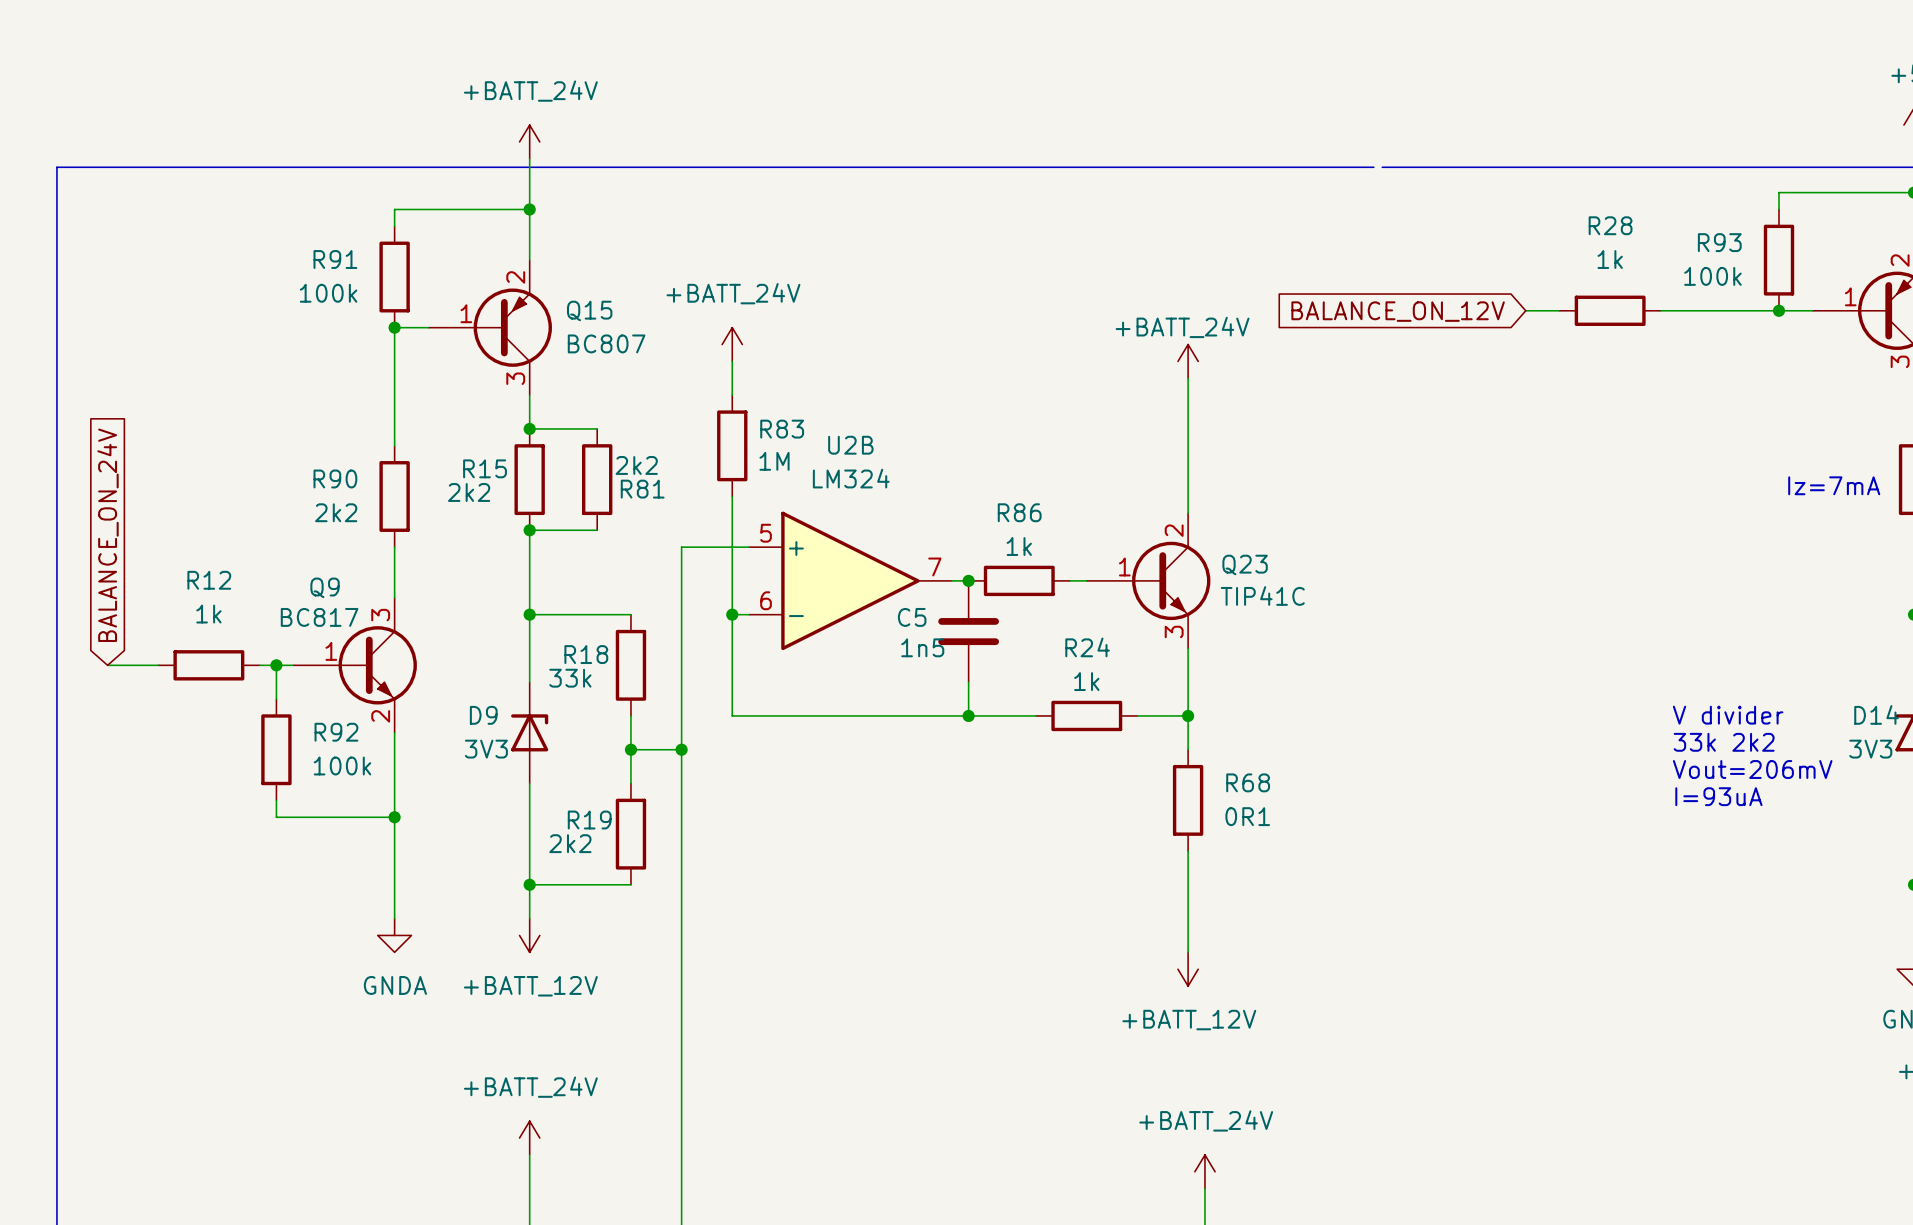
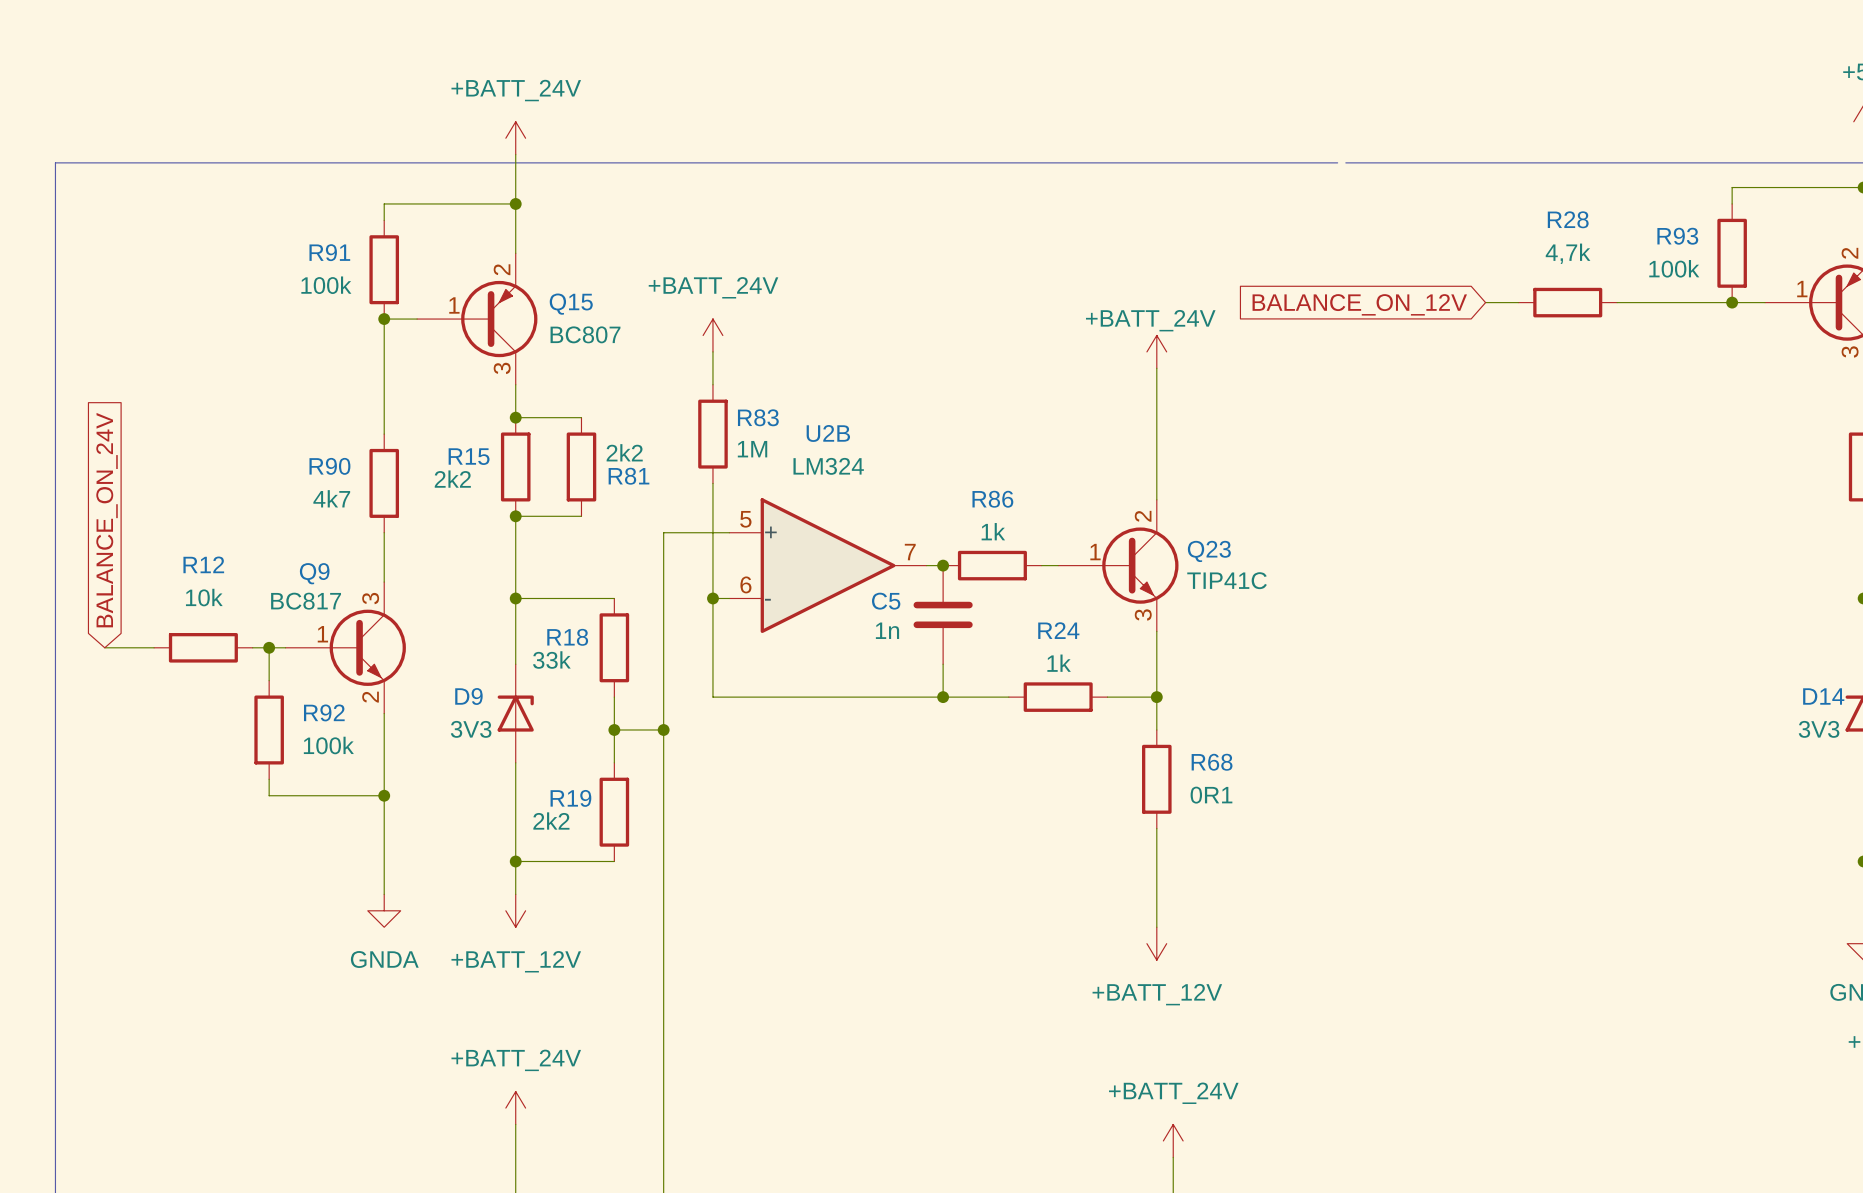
R28 value: 1k (1610, 259) -> 4,7k (1568, 253)
text: Iz=7mA (1834, 485) -> none
R90 value: 2k2 (336, 512) -> 4k7 (331, 498)
R12 value: 1k (208, 614) -> 10k (204, 597)
C5 value: 1n5 (922, 647) -> 1n (887, 630)
text: V divider (1728, 715) -> none
text: 33k 2k2 (1724, 742) -> none
text: Vout=206mV (1752, 769) -> none
text: I=93uA (1718, 796) -> none

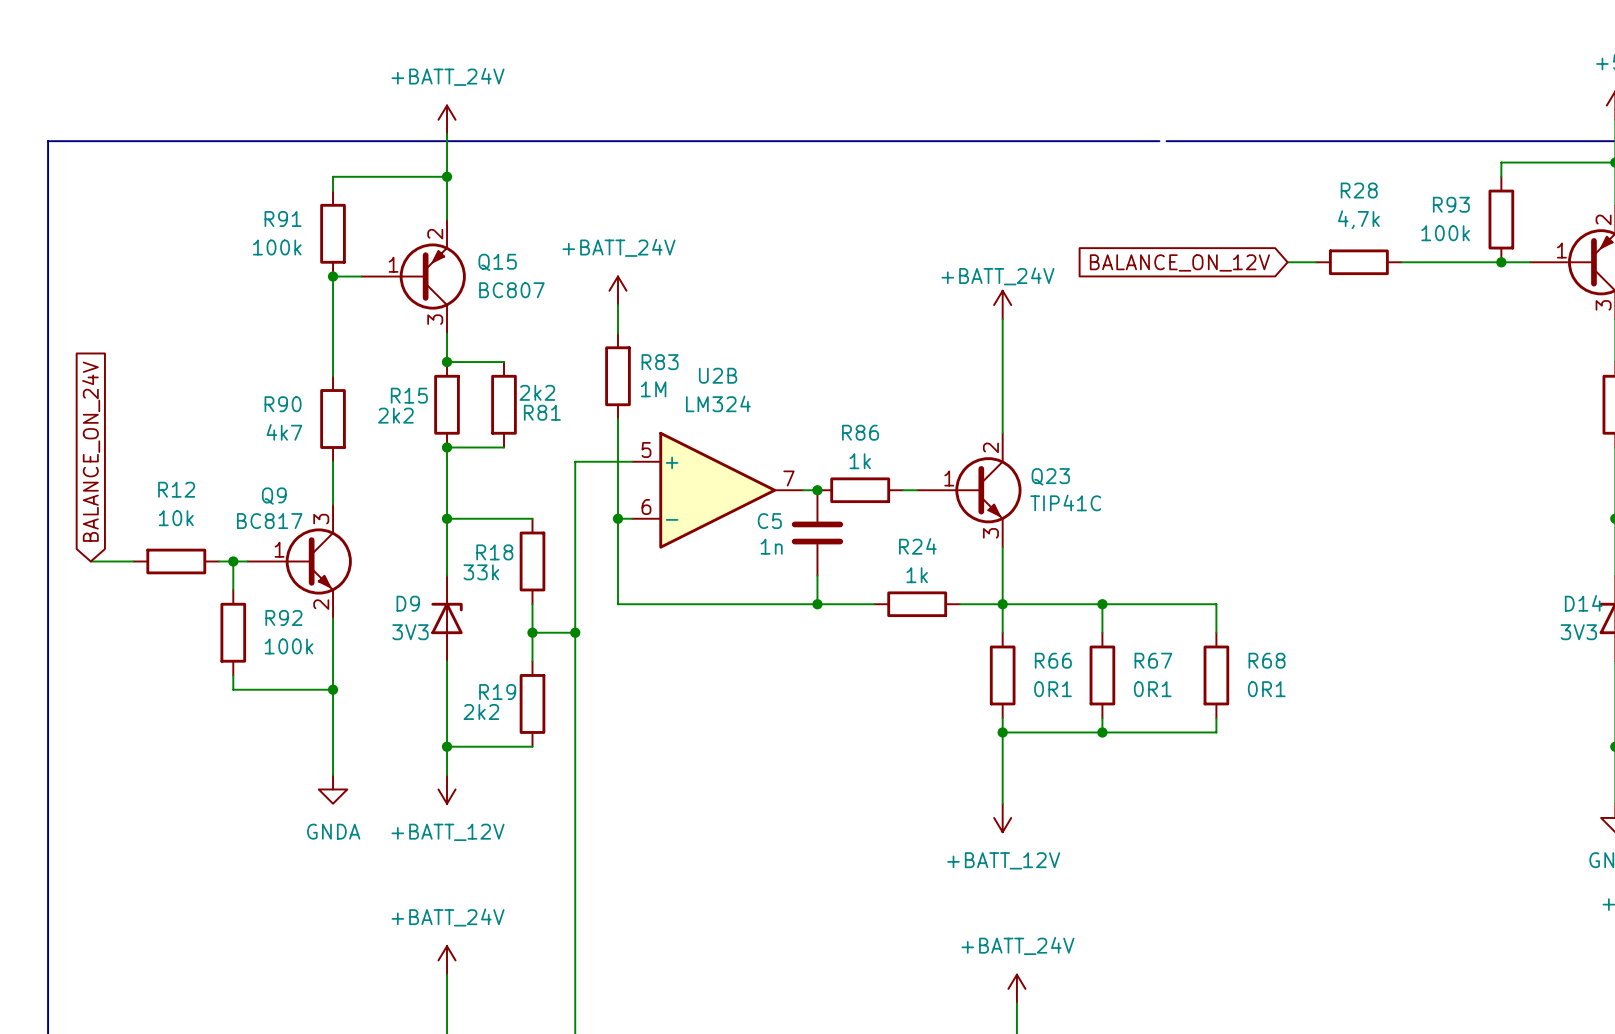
wire: none -> (1002, 604) (1216, 604) (1216, 632)
wire: none -> (1102, 604) (1102, 632)
junction: none -> (1102, 604)
R68 name: R68 (1212, 762) -> R66 (1053, 660)
R67: none -> 0R1 (1102, 675)
R68: none -> 0R1 (1216, 675)
wire: none -> (1102, 718) (1102, 732)
wire: none -> (1216, 718) (1216, 732) (1002, 732)
junction: none -> (1002, 732)
junction: none -> (1102, 732)

